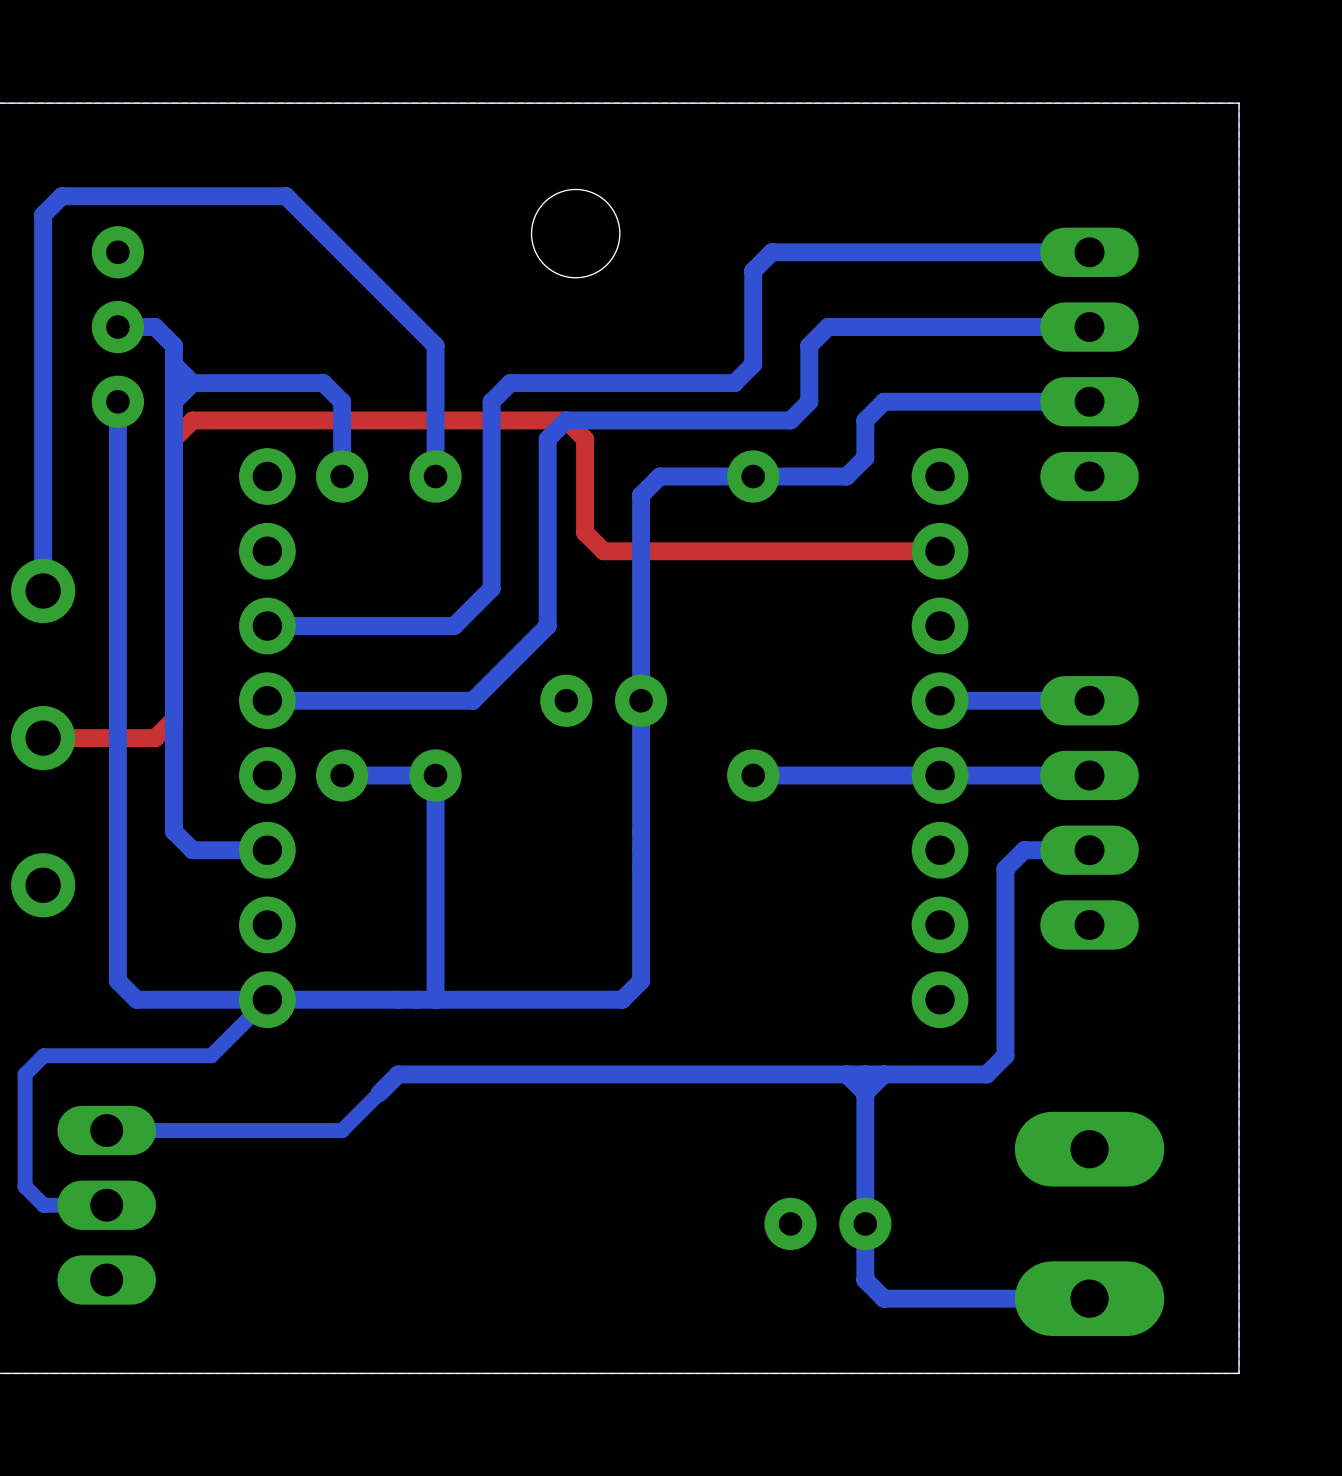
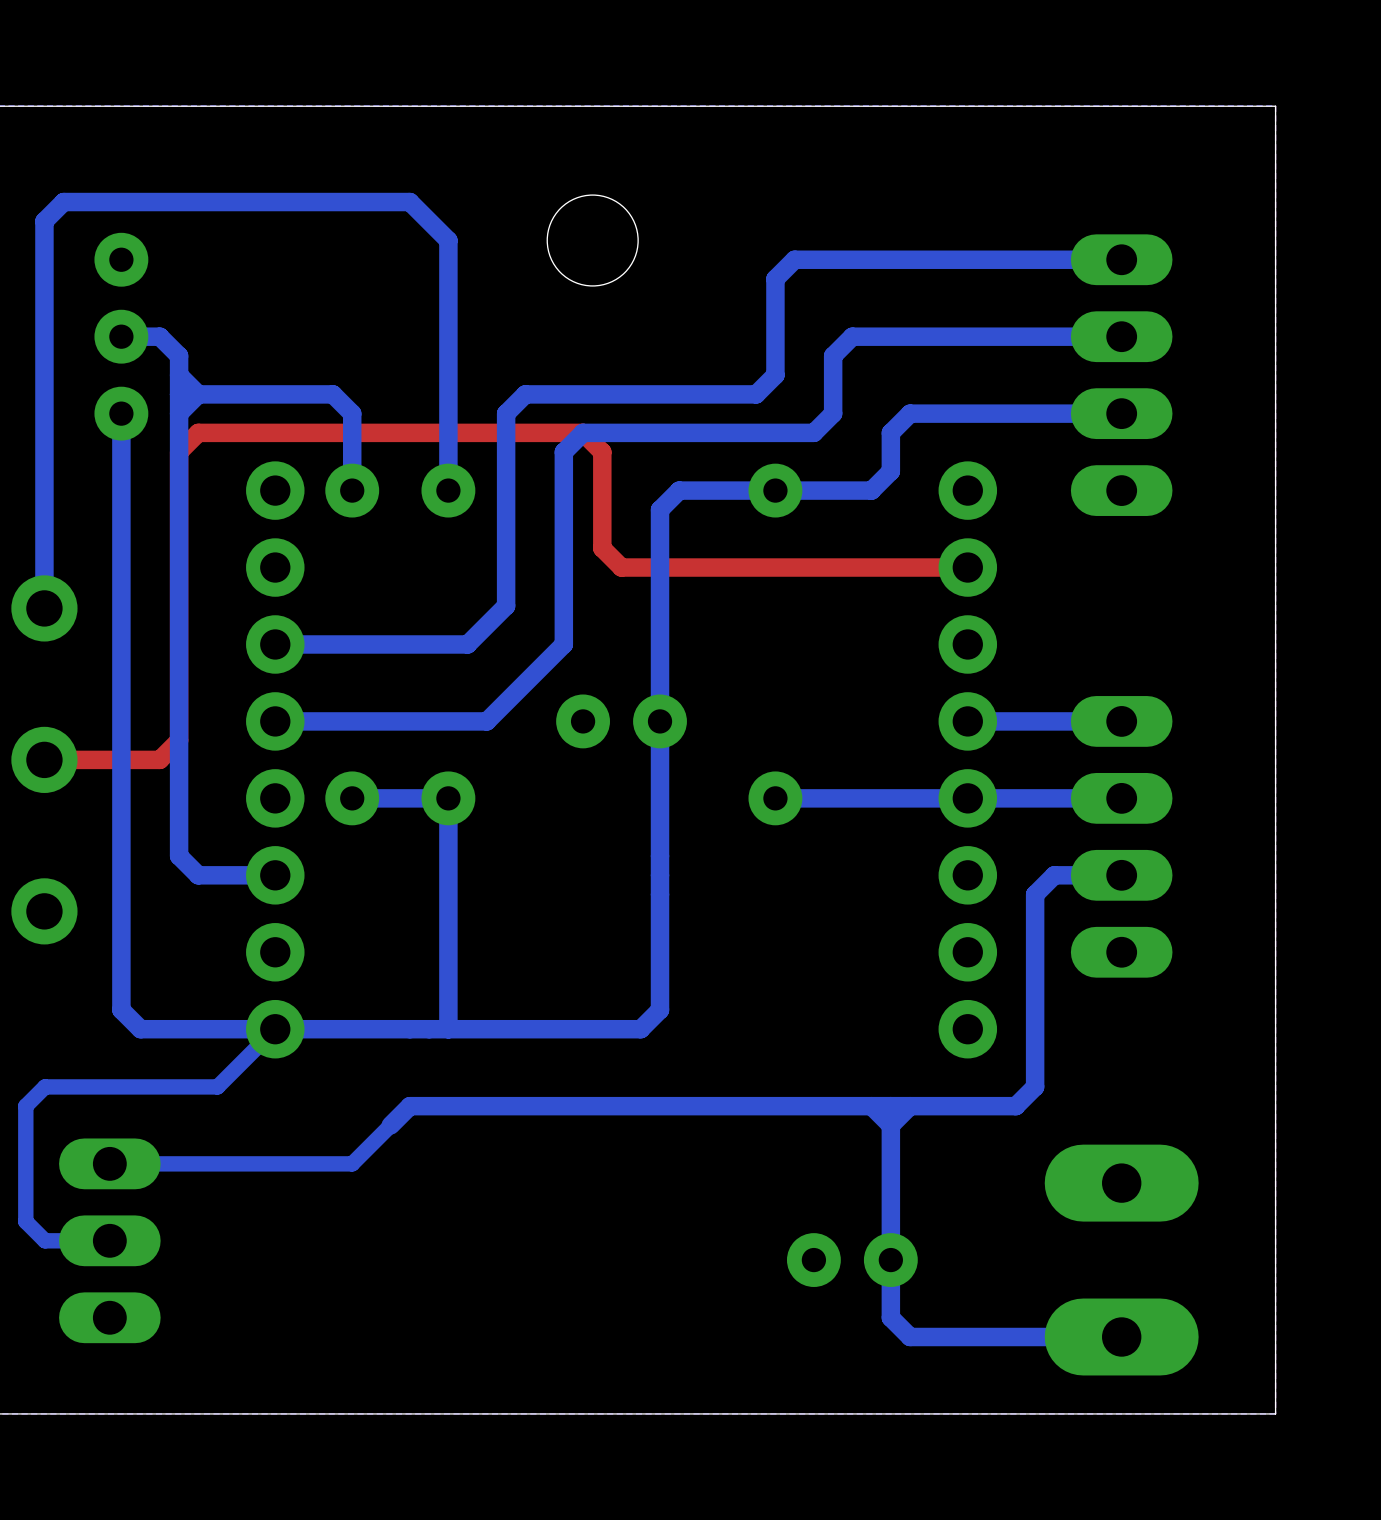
bottom track: (286, 196) (435, 345) -> (294, 202) (409, 202) (448, 240) (448, 355)

